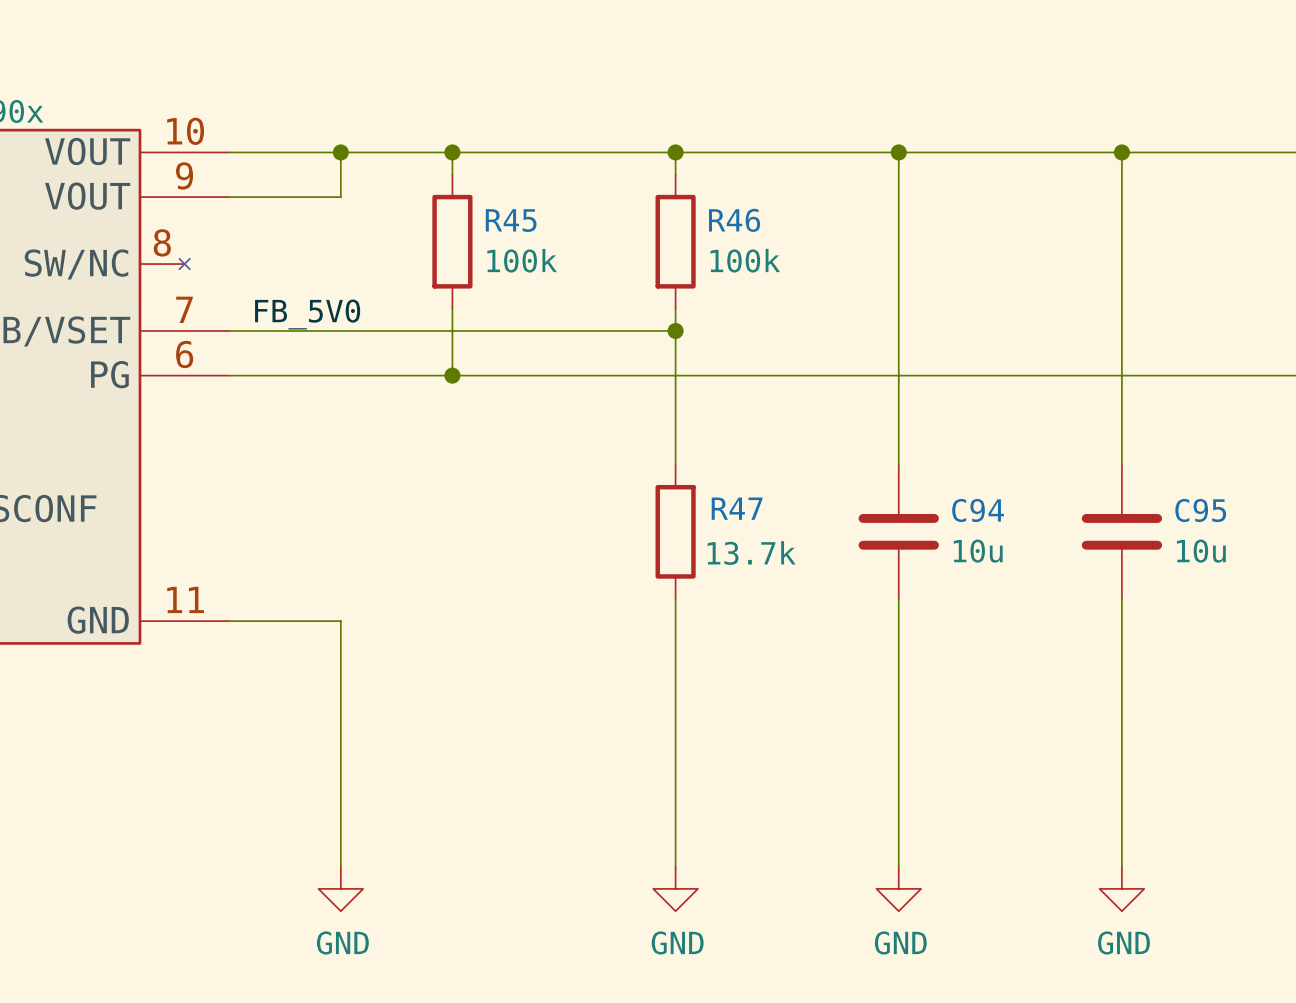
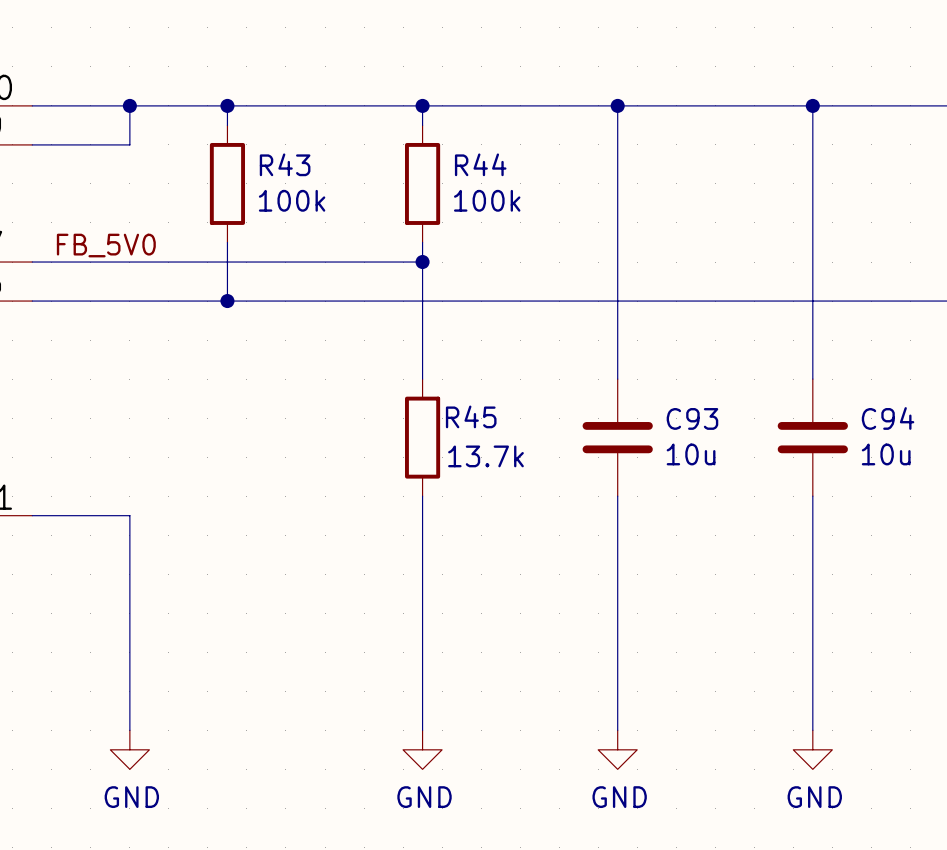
R45 name: R45 (511, 220) -> R43 (285, 164)
R46 name: R46 (734, 220) -> R44 (480, 164)
R47 name: R47 (737, 508) -> R45 (471, 416)
C94 name: C94 (978, 510) -> C93 (692, 418)
C95 name: C95 (1200, 510) -> C94 (888, 418)

